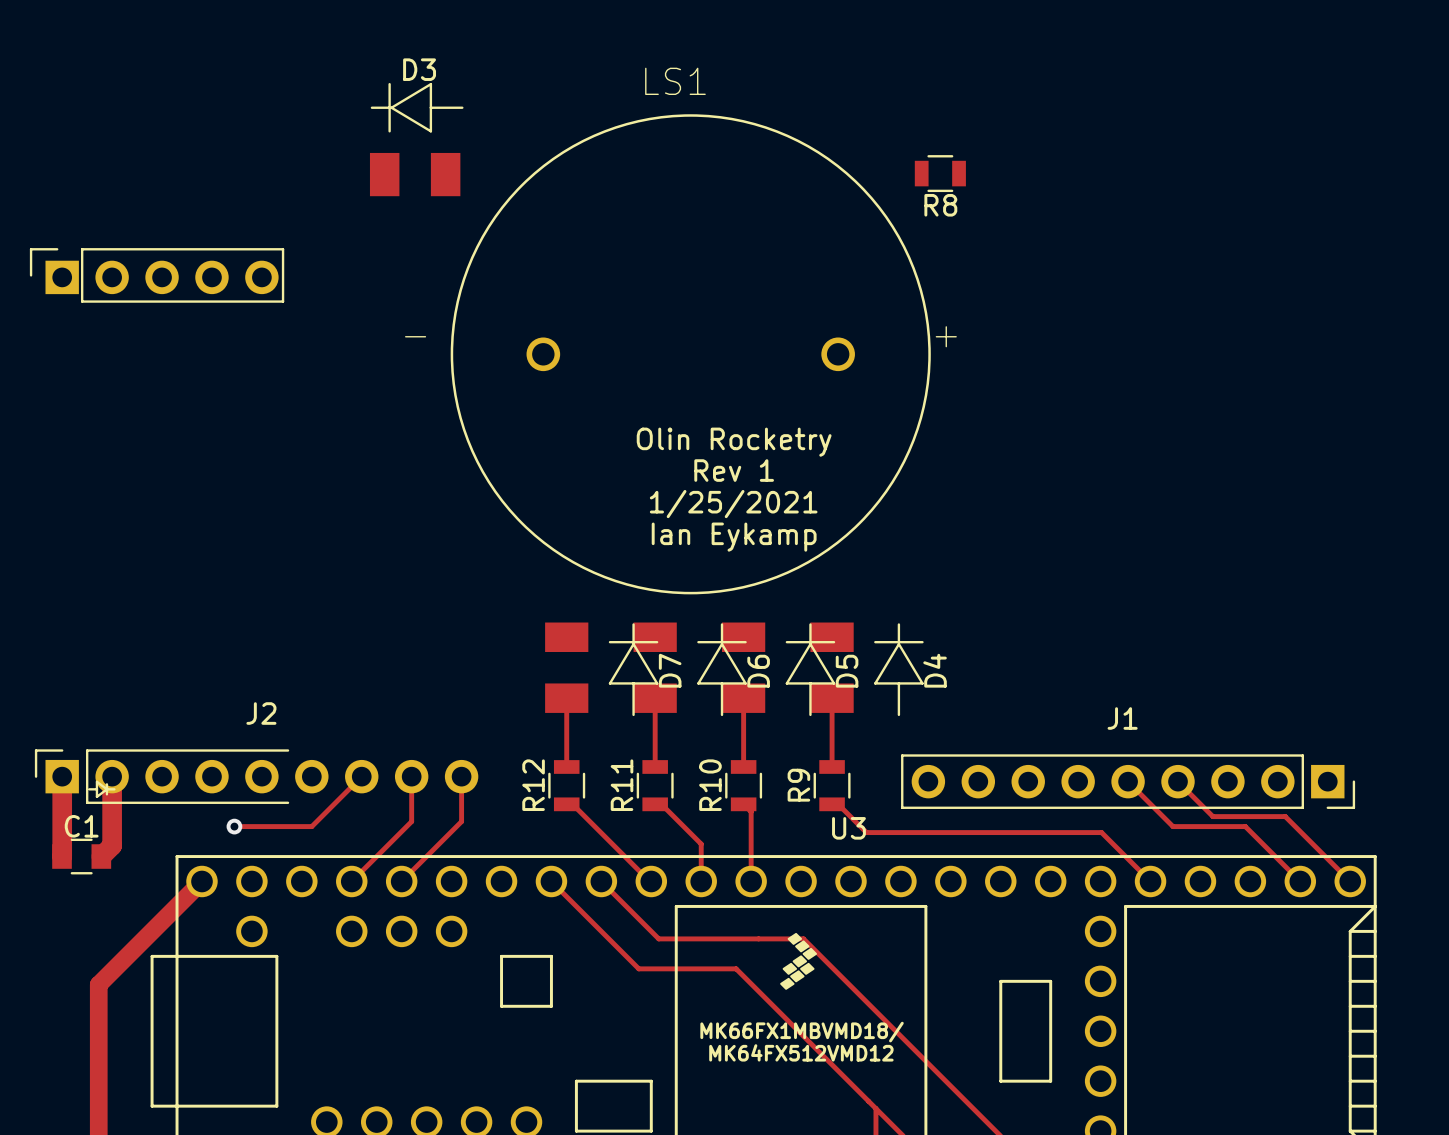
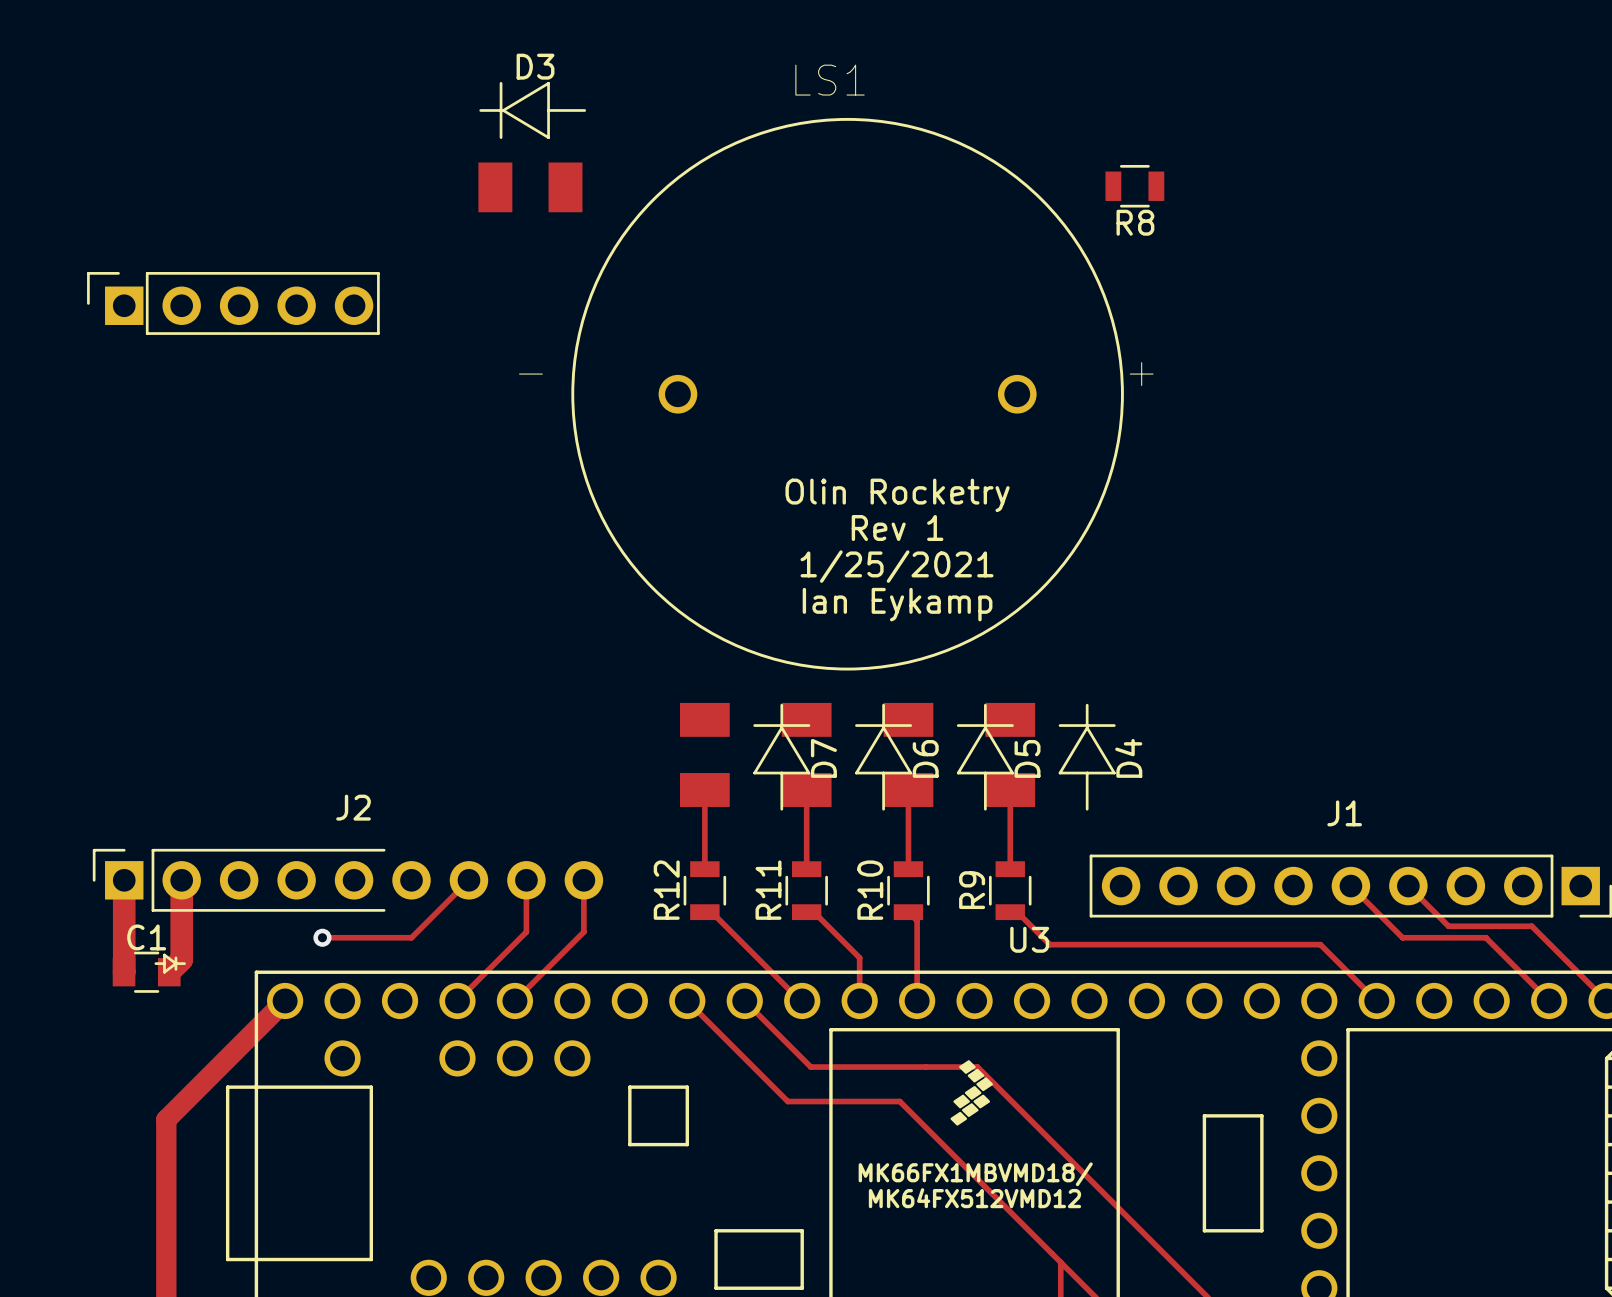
line: (106, 784) (106, 794) -> (175, 957) (175, 969)
line: (89, 789) (96, 789) -> (155, 963) (164, 963)
line: (106, 789) (114, 789) -> (175, 963) (184, 963)
line: (106, 789) (96, 781) (96, 796) (106, 789) -> (175, 963) (164, 955) (164, 972) (175, 963)

